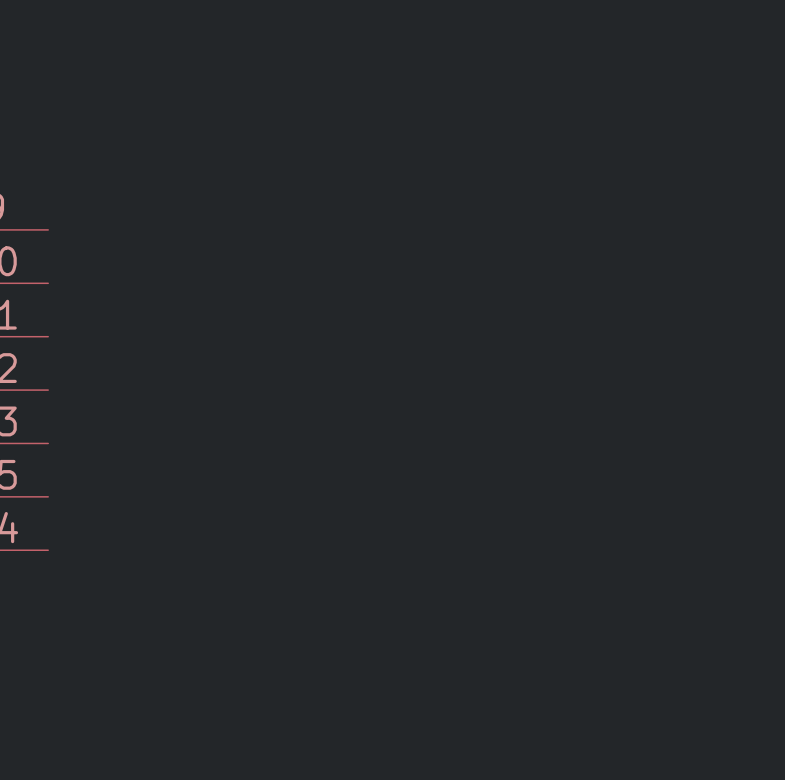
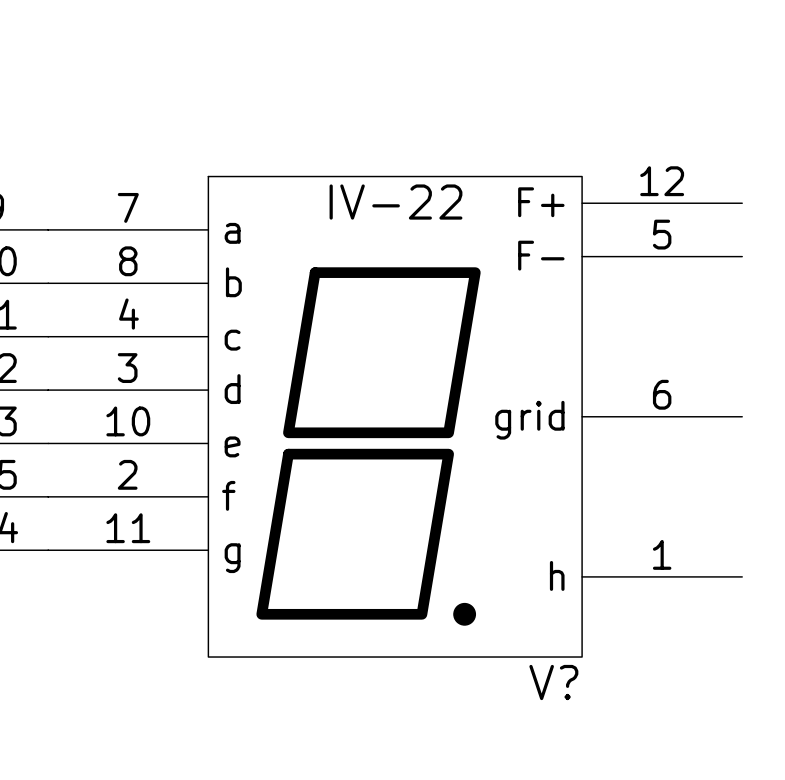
V?: none -> IV-22 (395, 416)

